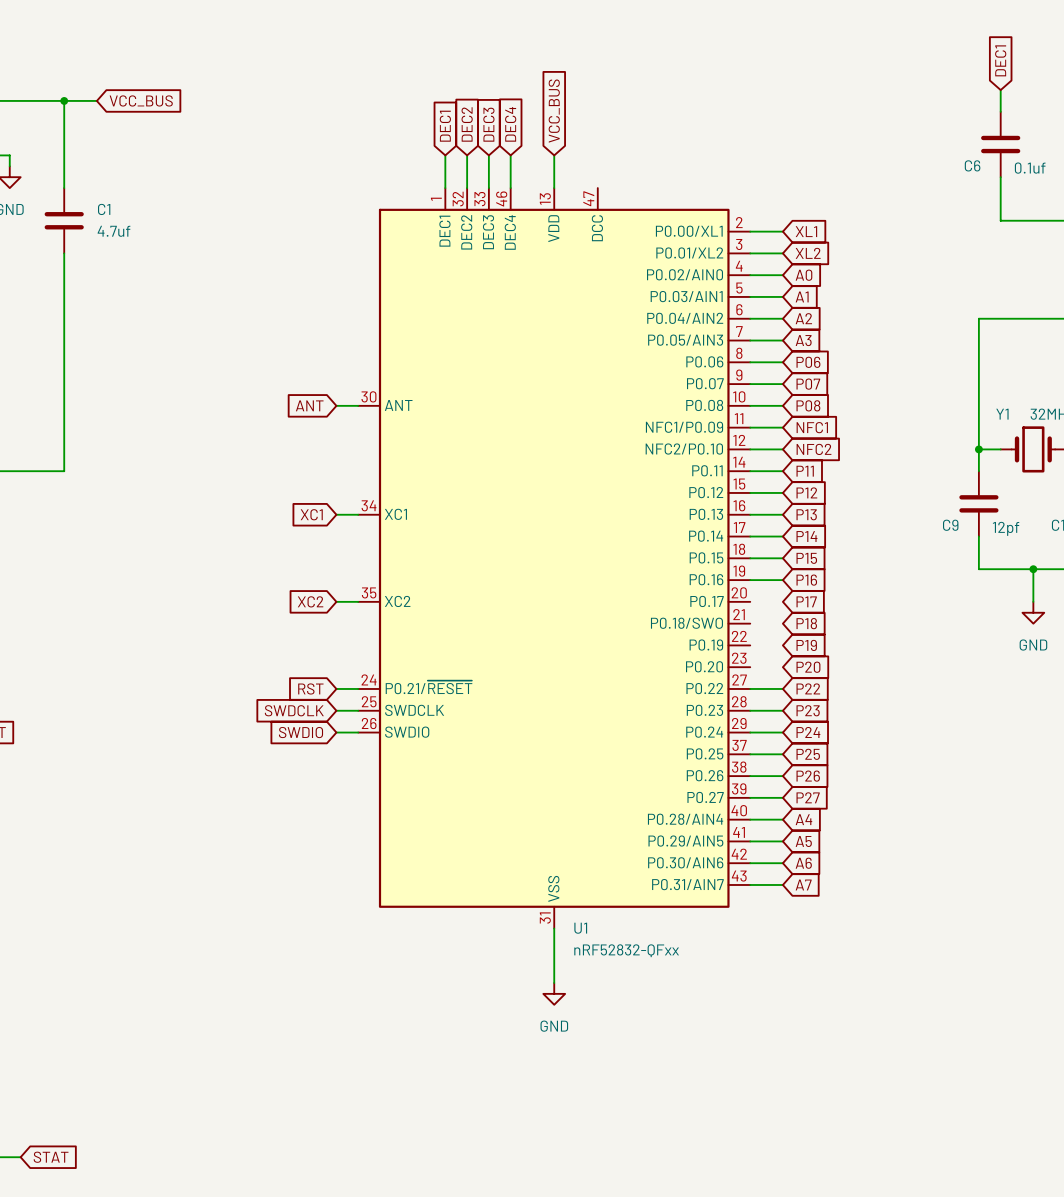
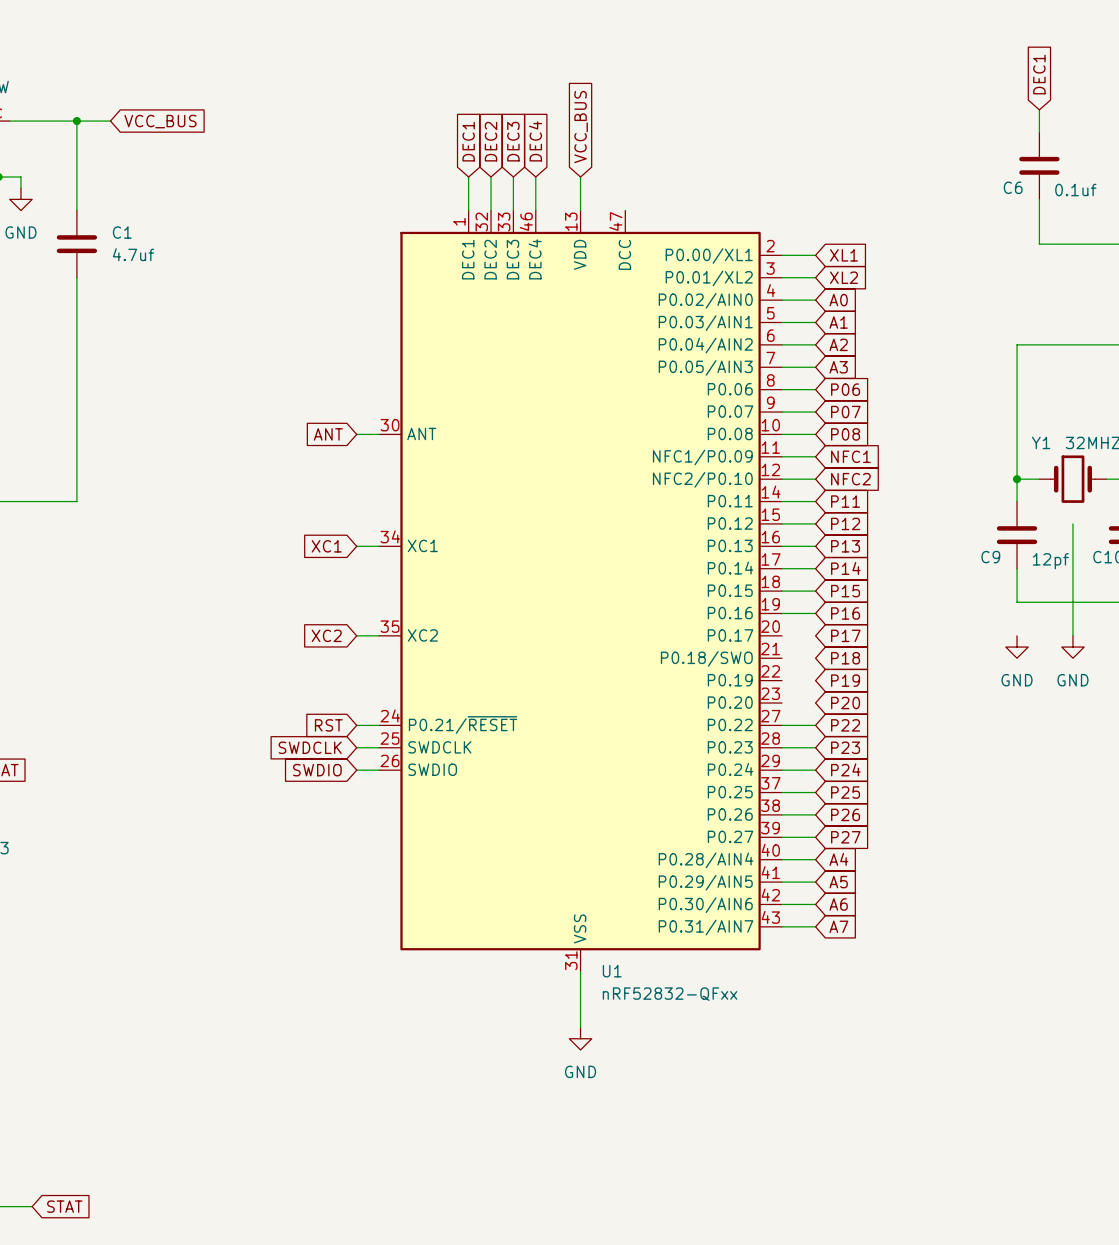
wire: none -> (1072, 523) (1072, 602)
junction: (1033, 569) -> none
power symbol: none -> GND (1017, 647)

